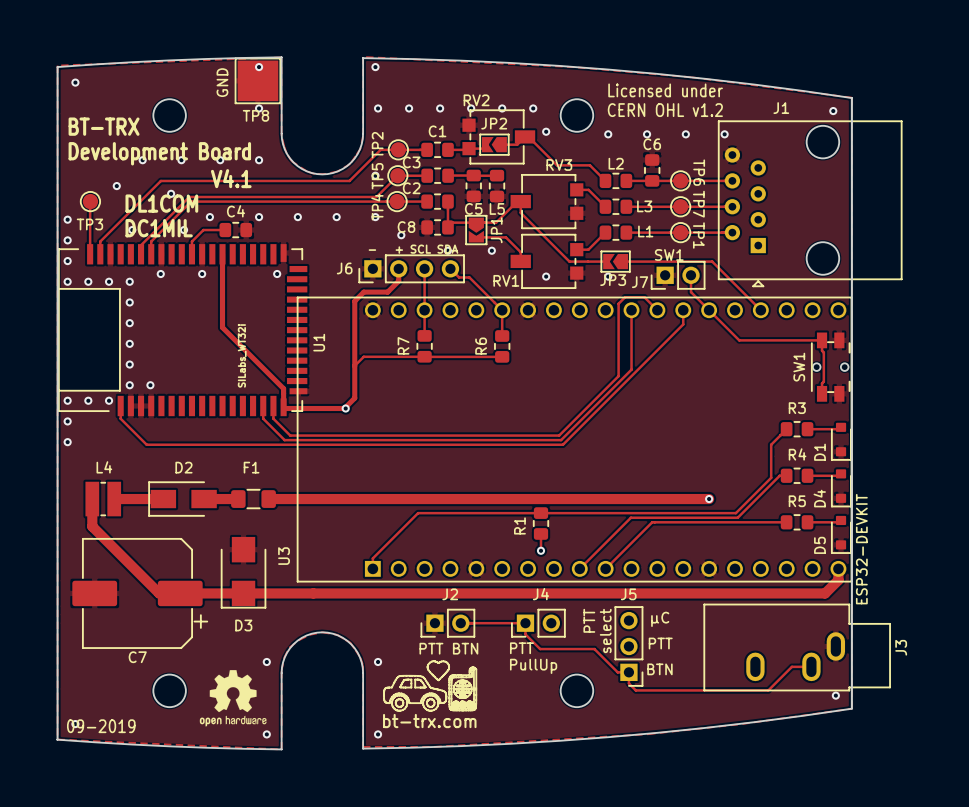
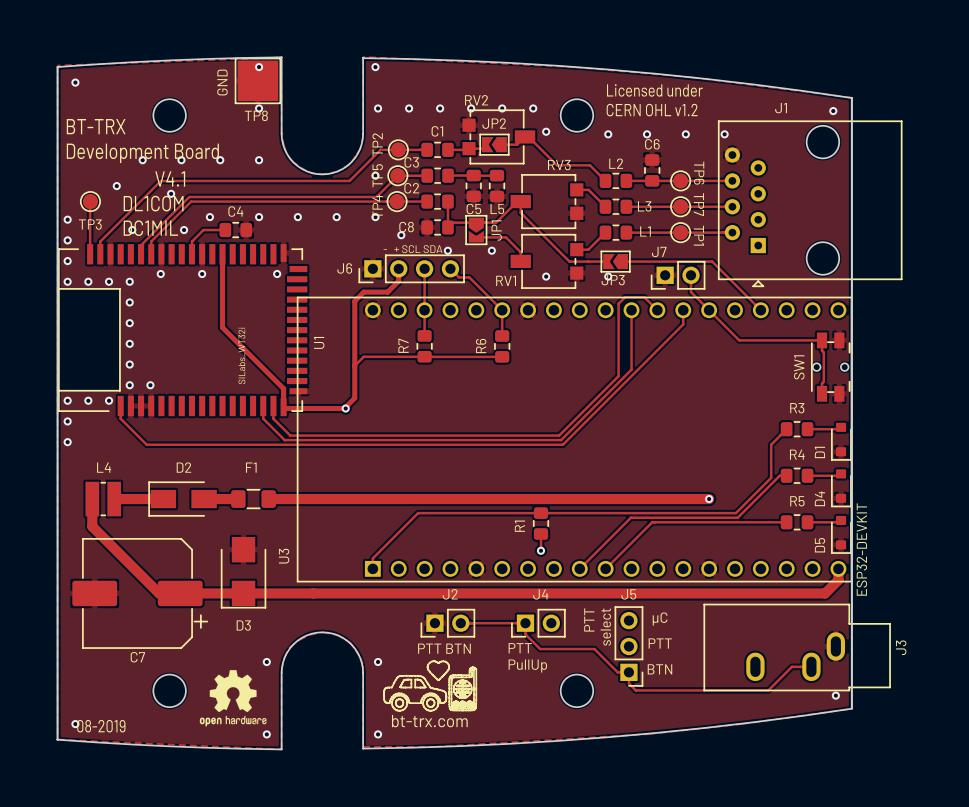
text: SW1 (669, 255) -> none
J7 name position: J7 (640, 282) -> J7 (659, 251)
text: 09-2019 (101, 726) -> 08-2019 (101, 726)

